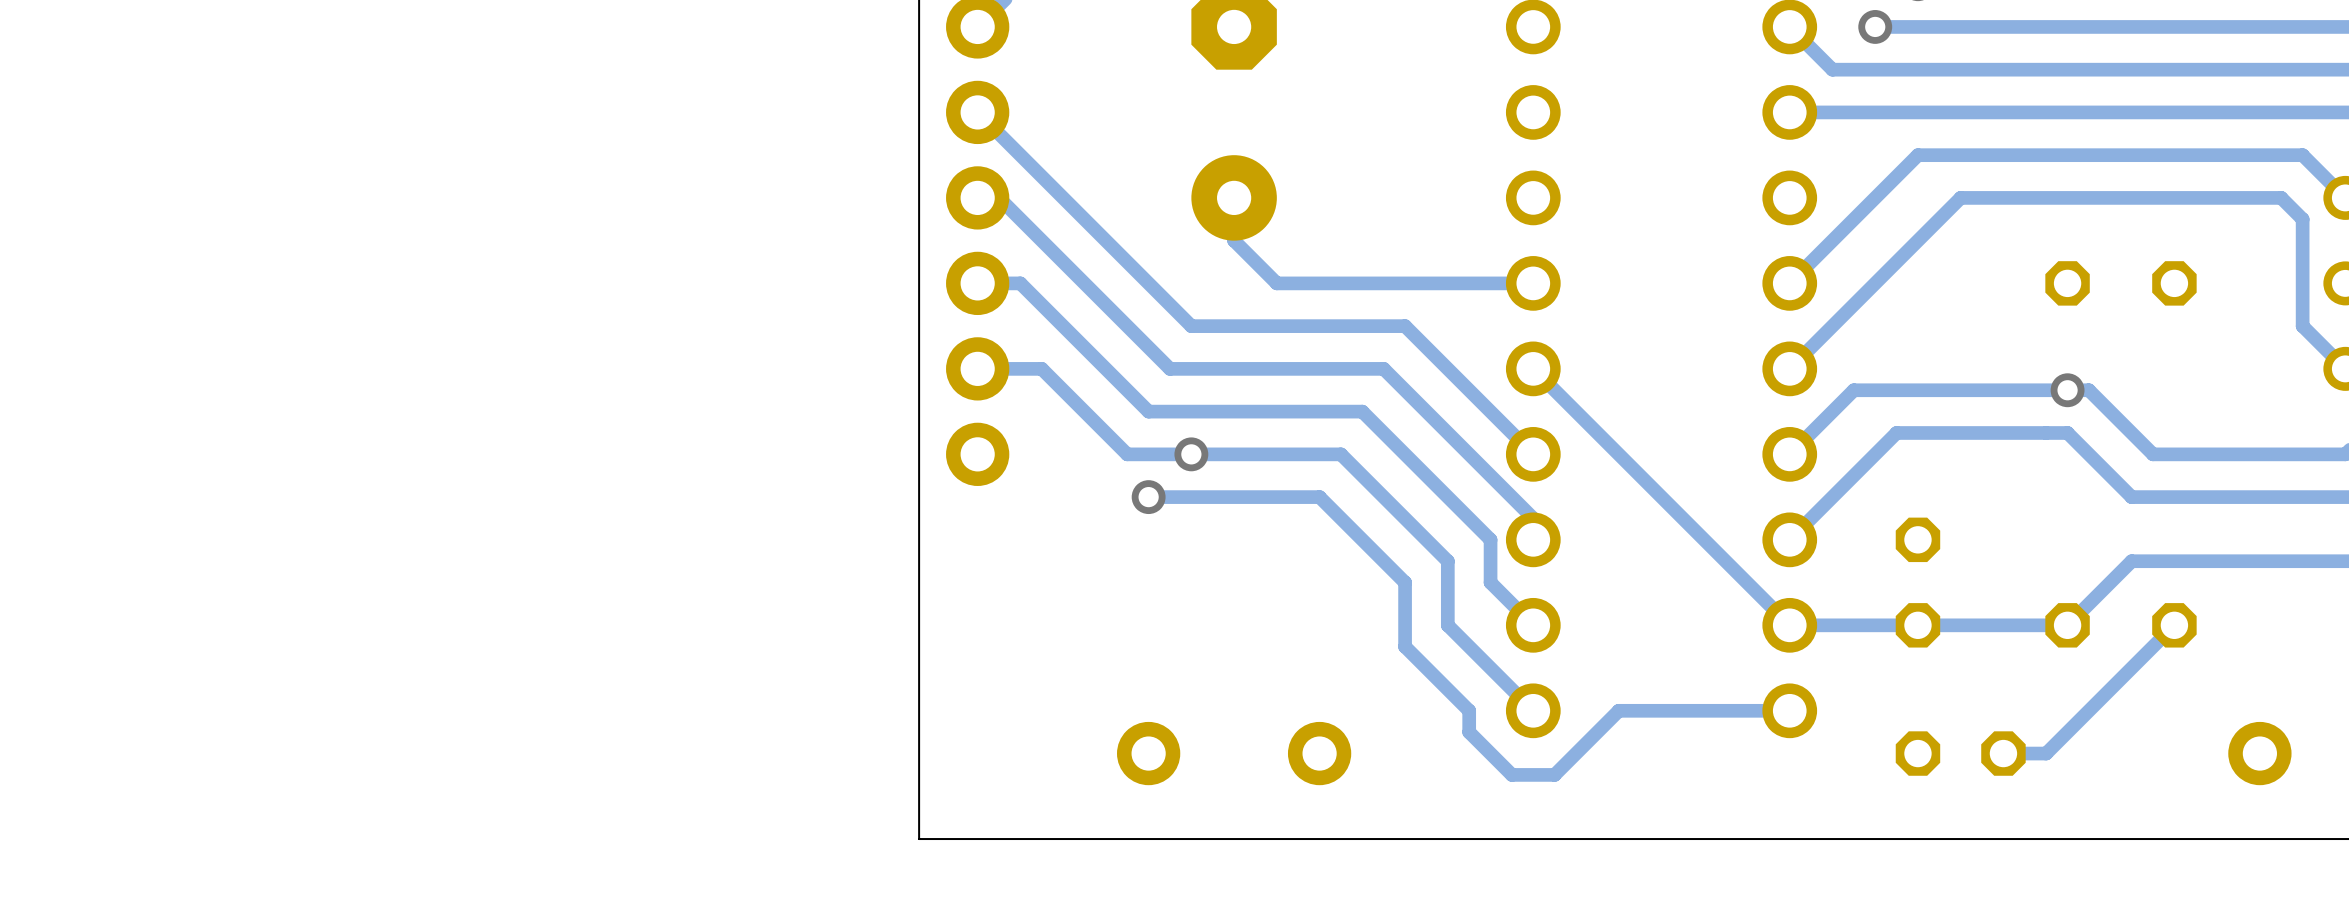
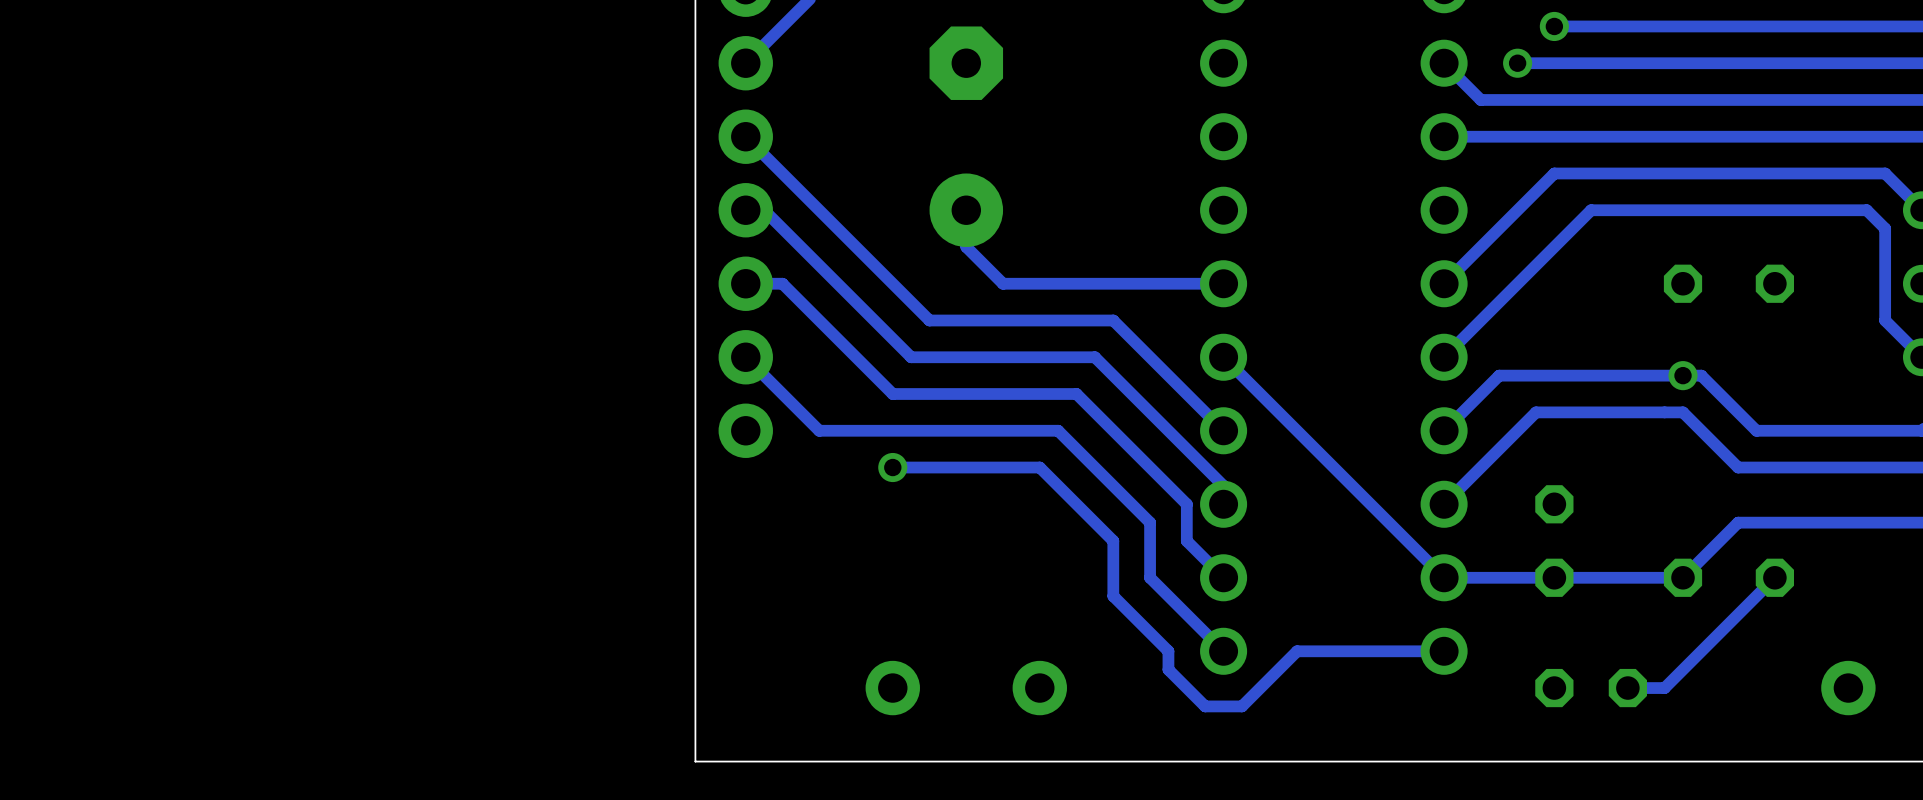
track: (977, 368) (1041, 368) (1127, 454) -> (745, 357) (819, 430) (874, 430)
via: (1191, 454) -> none

